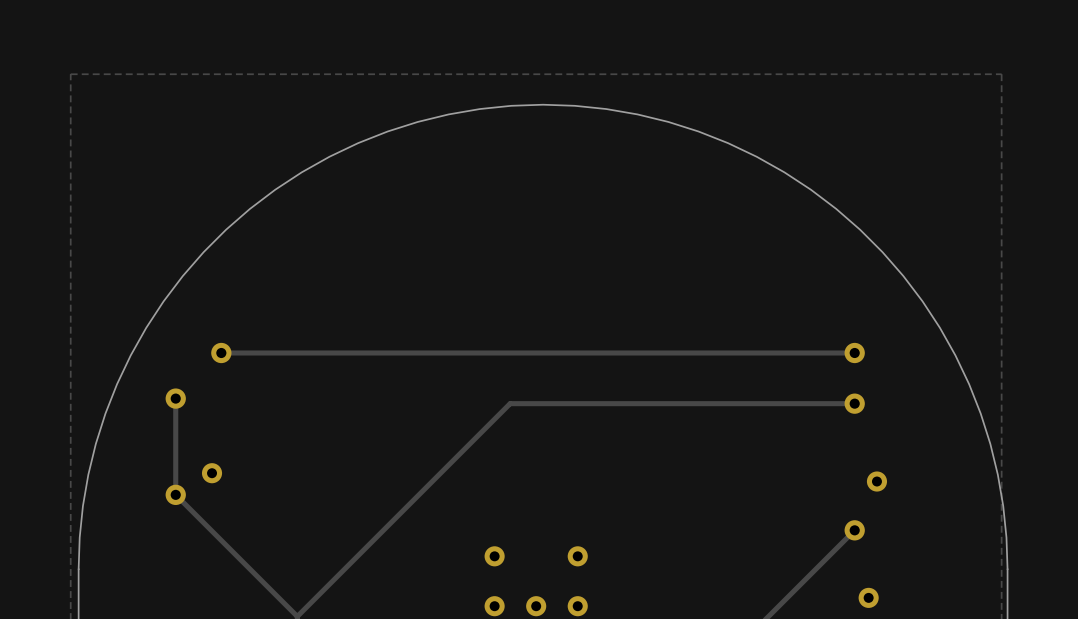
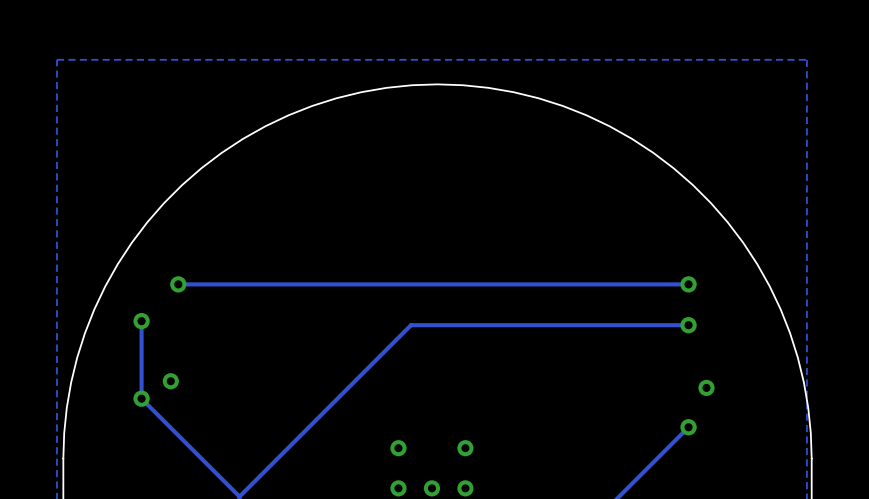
via: (868, 597) -> none

